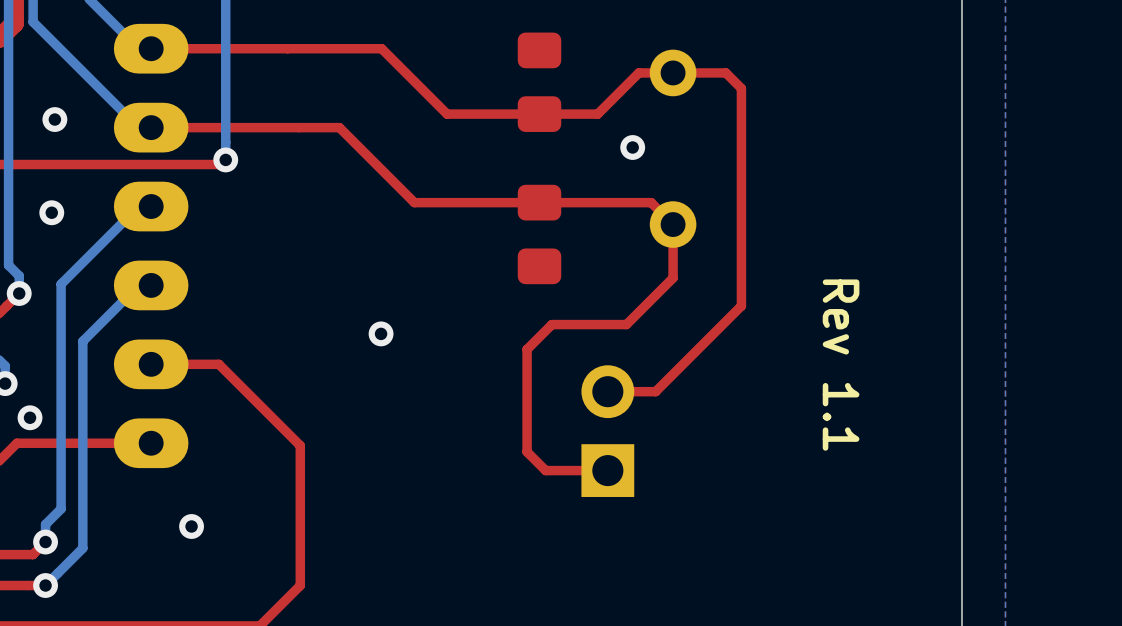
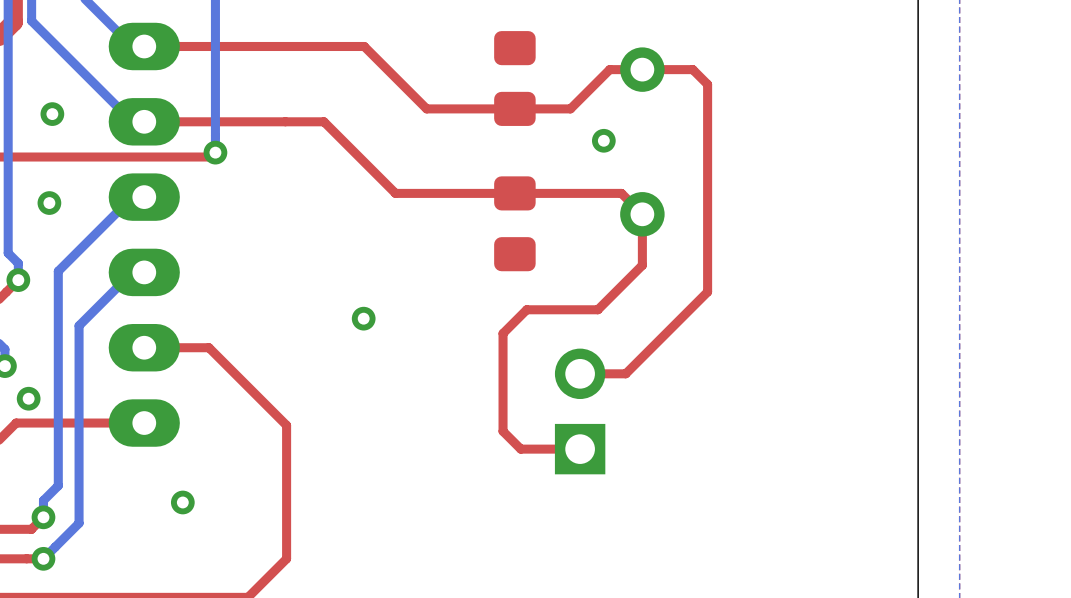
text: Rev 1.1 (841, 365) -> none

